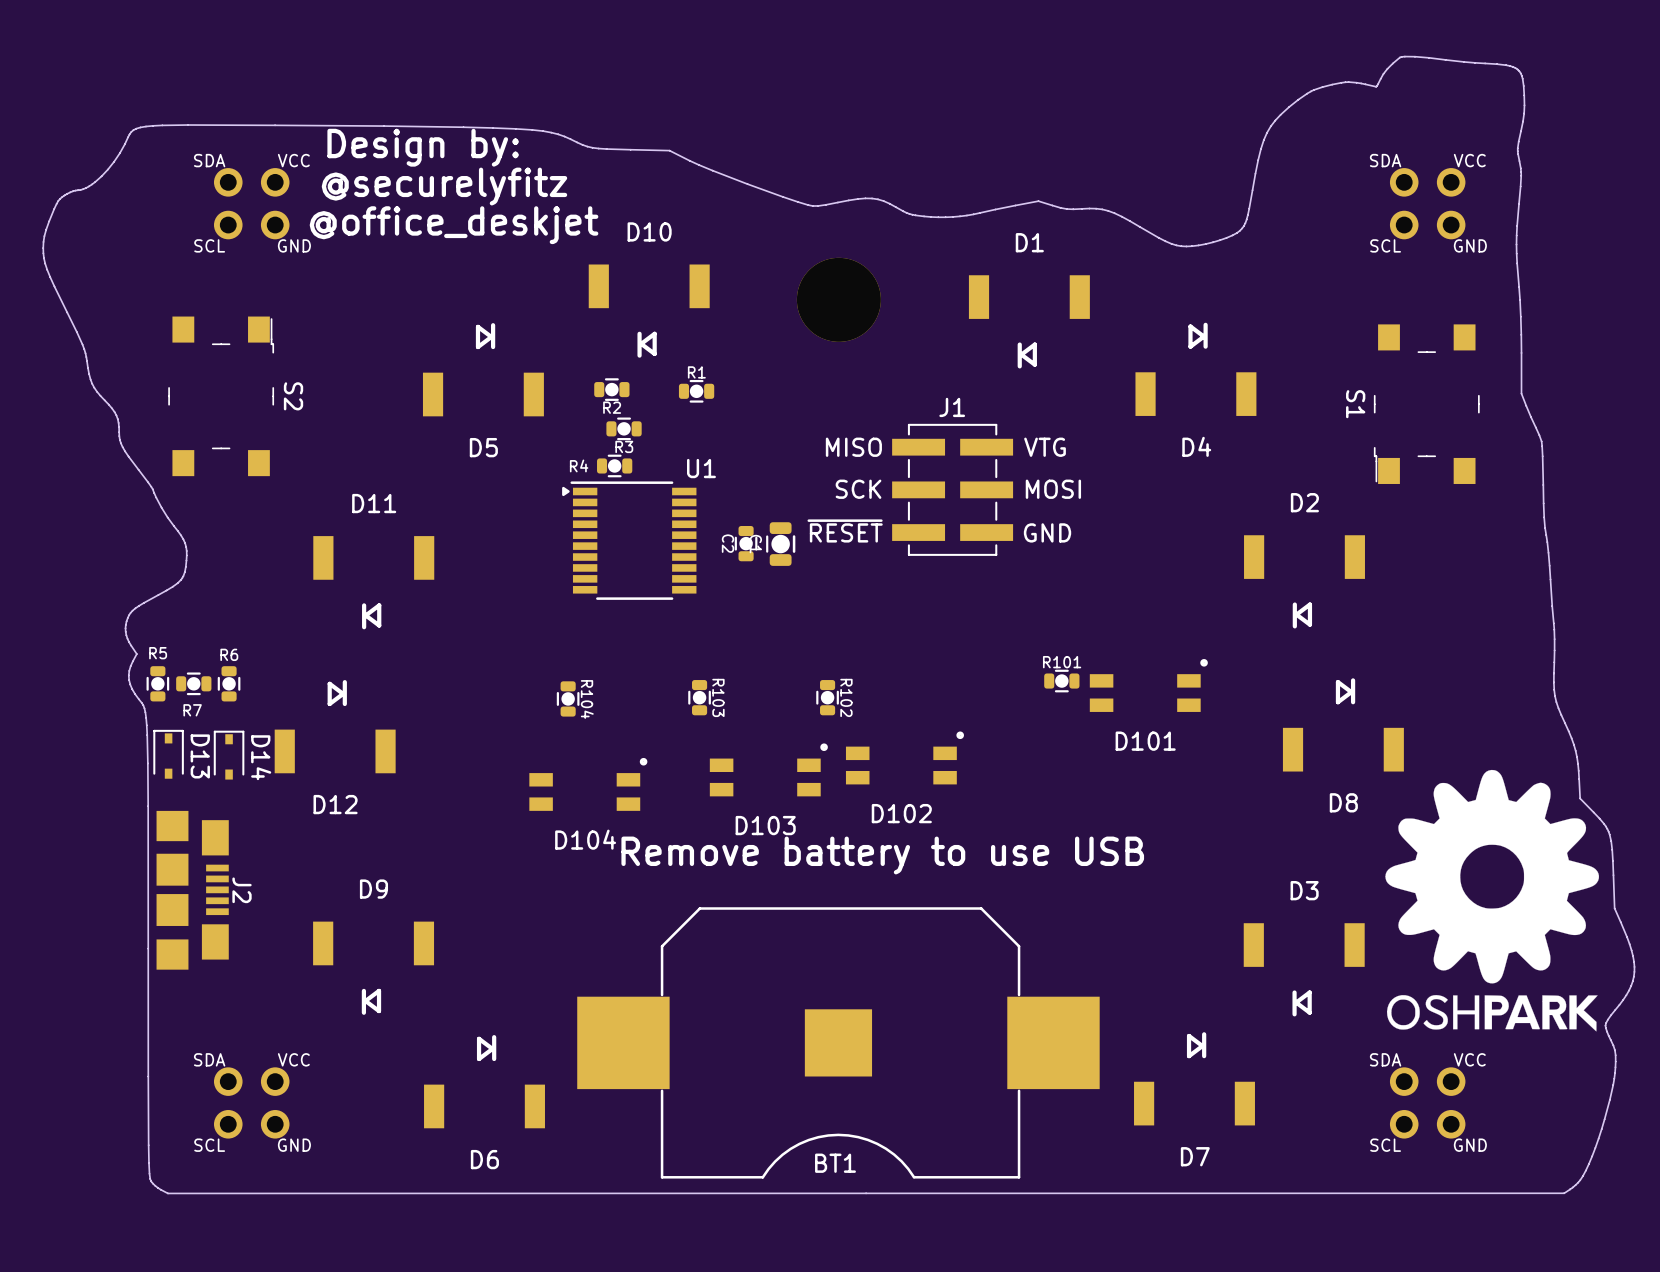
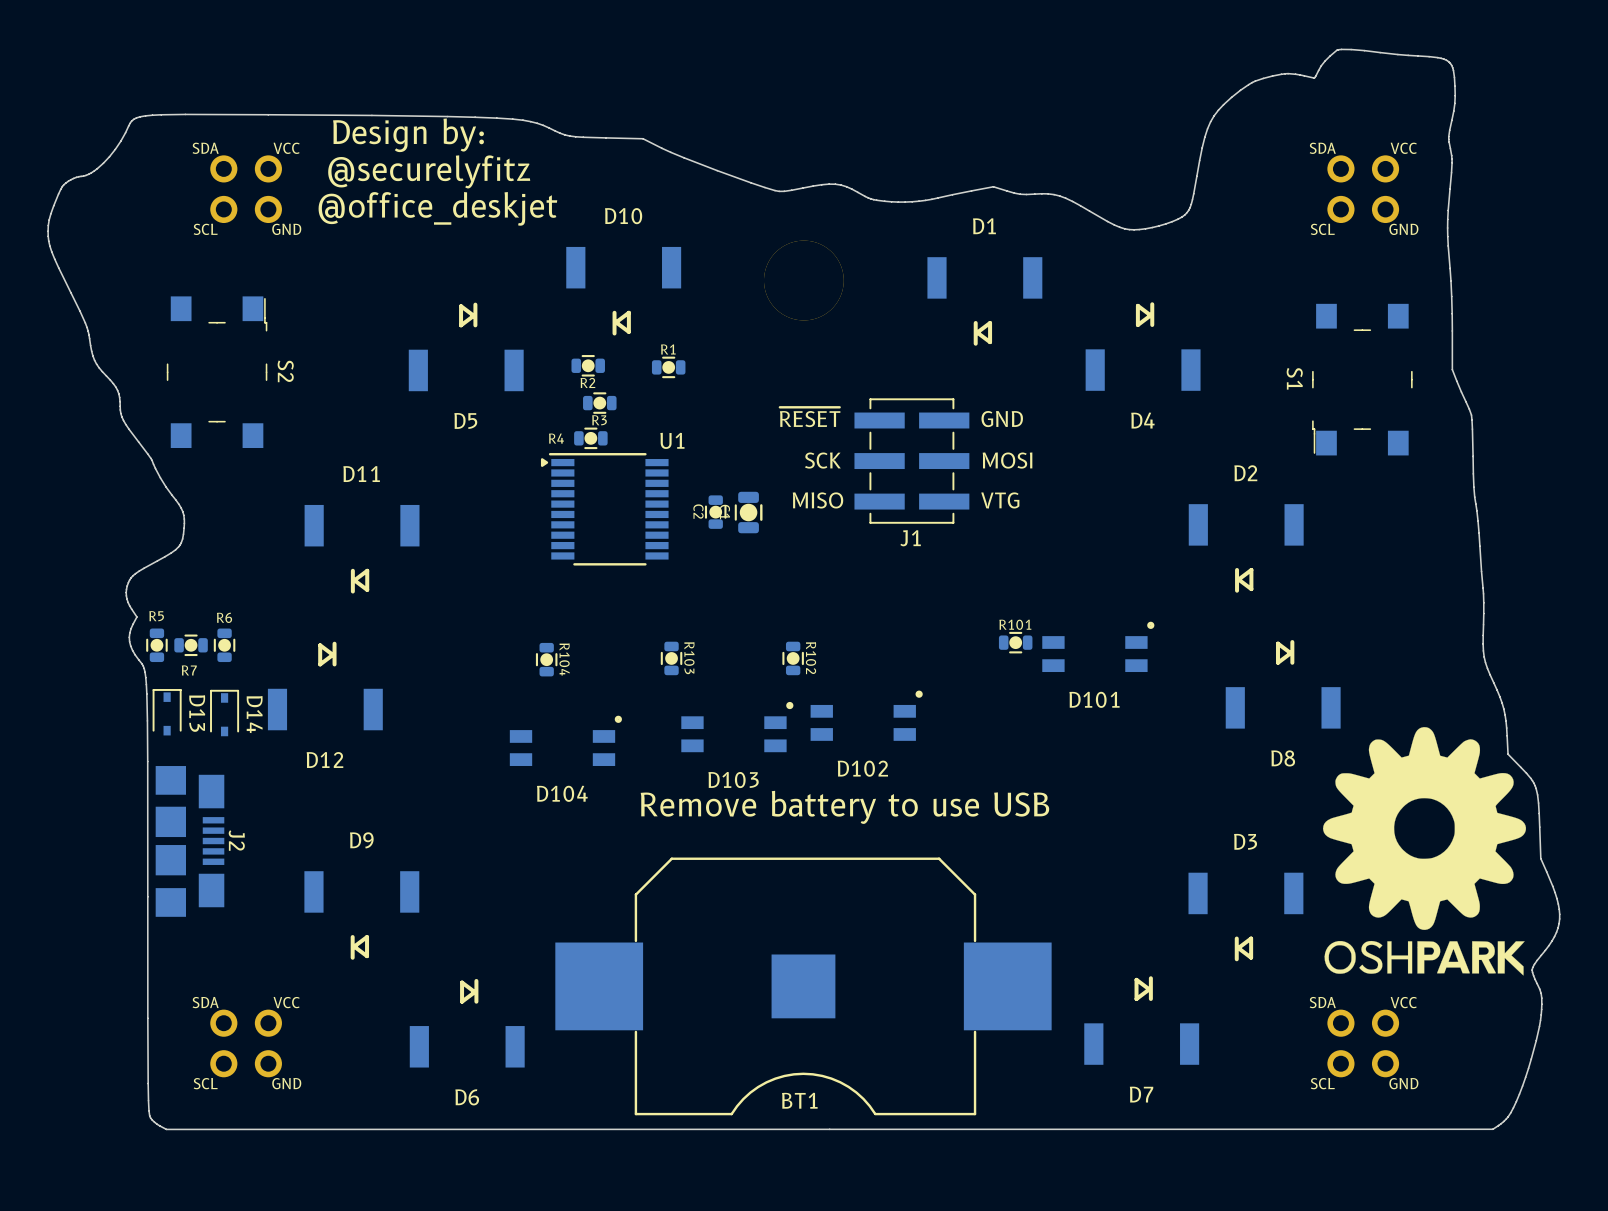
J1 side: bottom (952, 489) -> top (911, 461)

